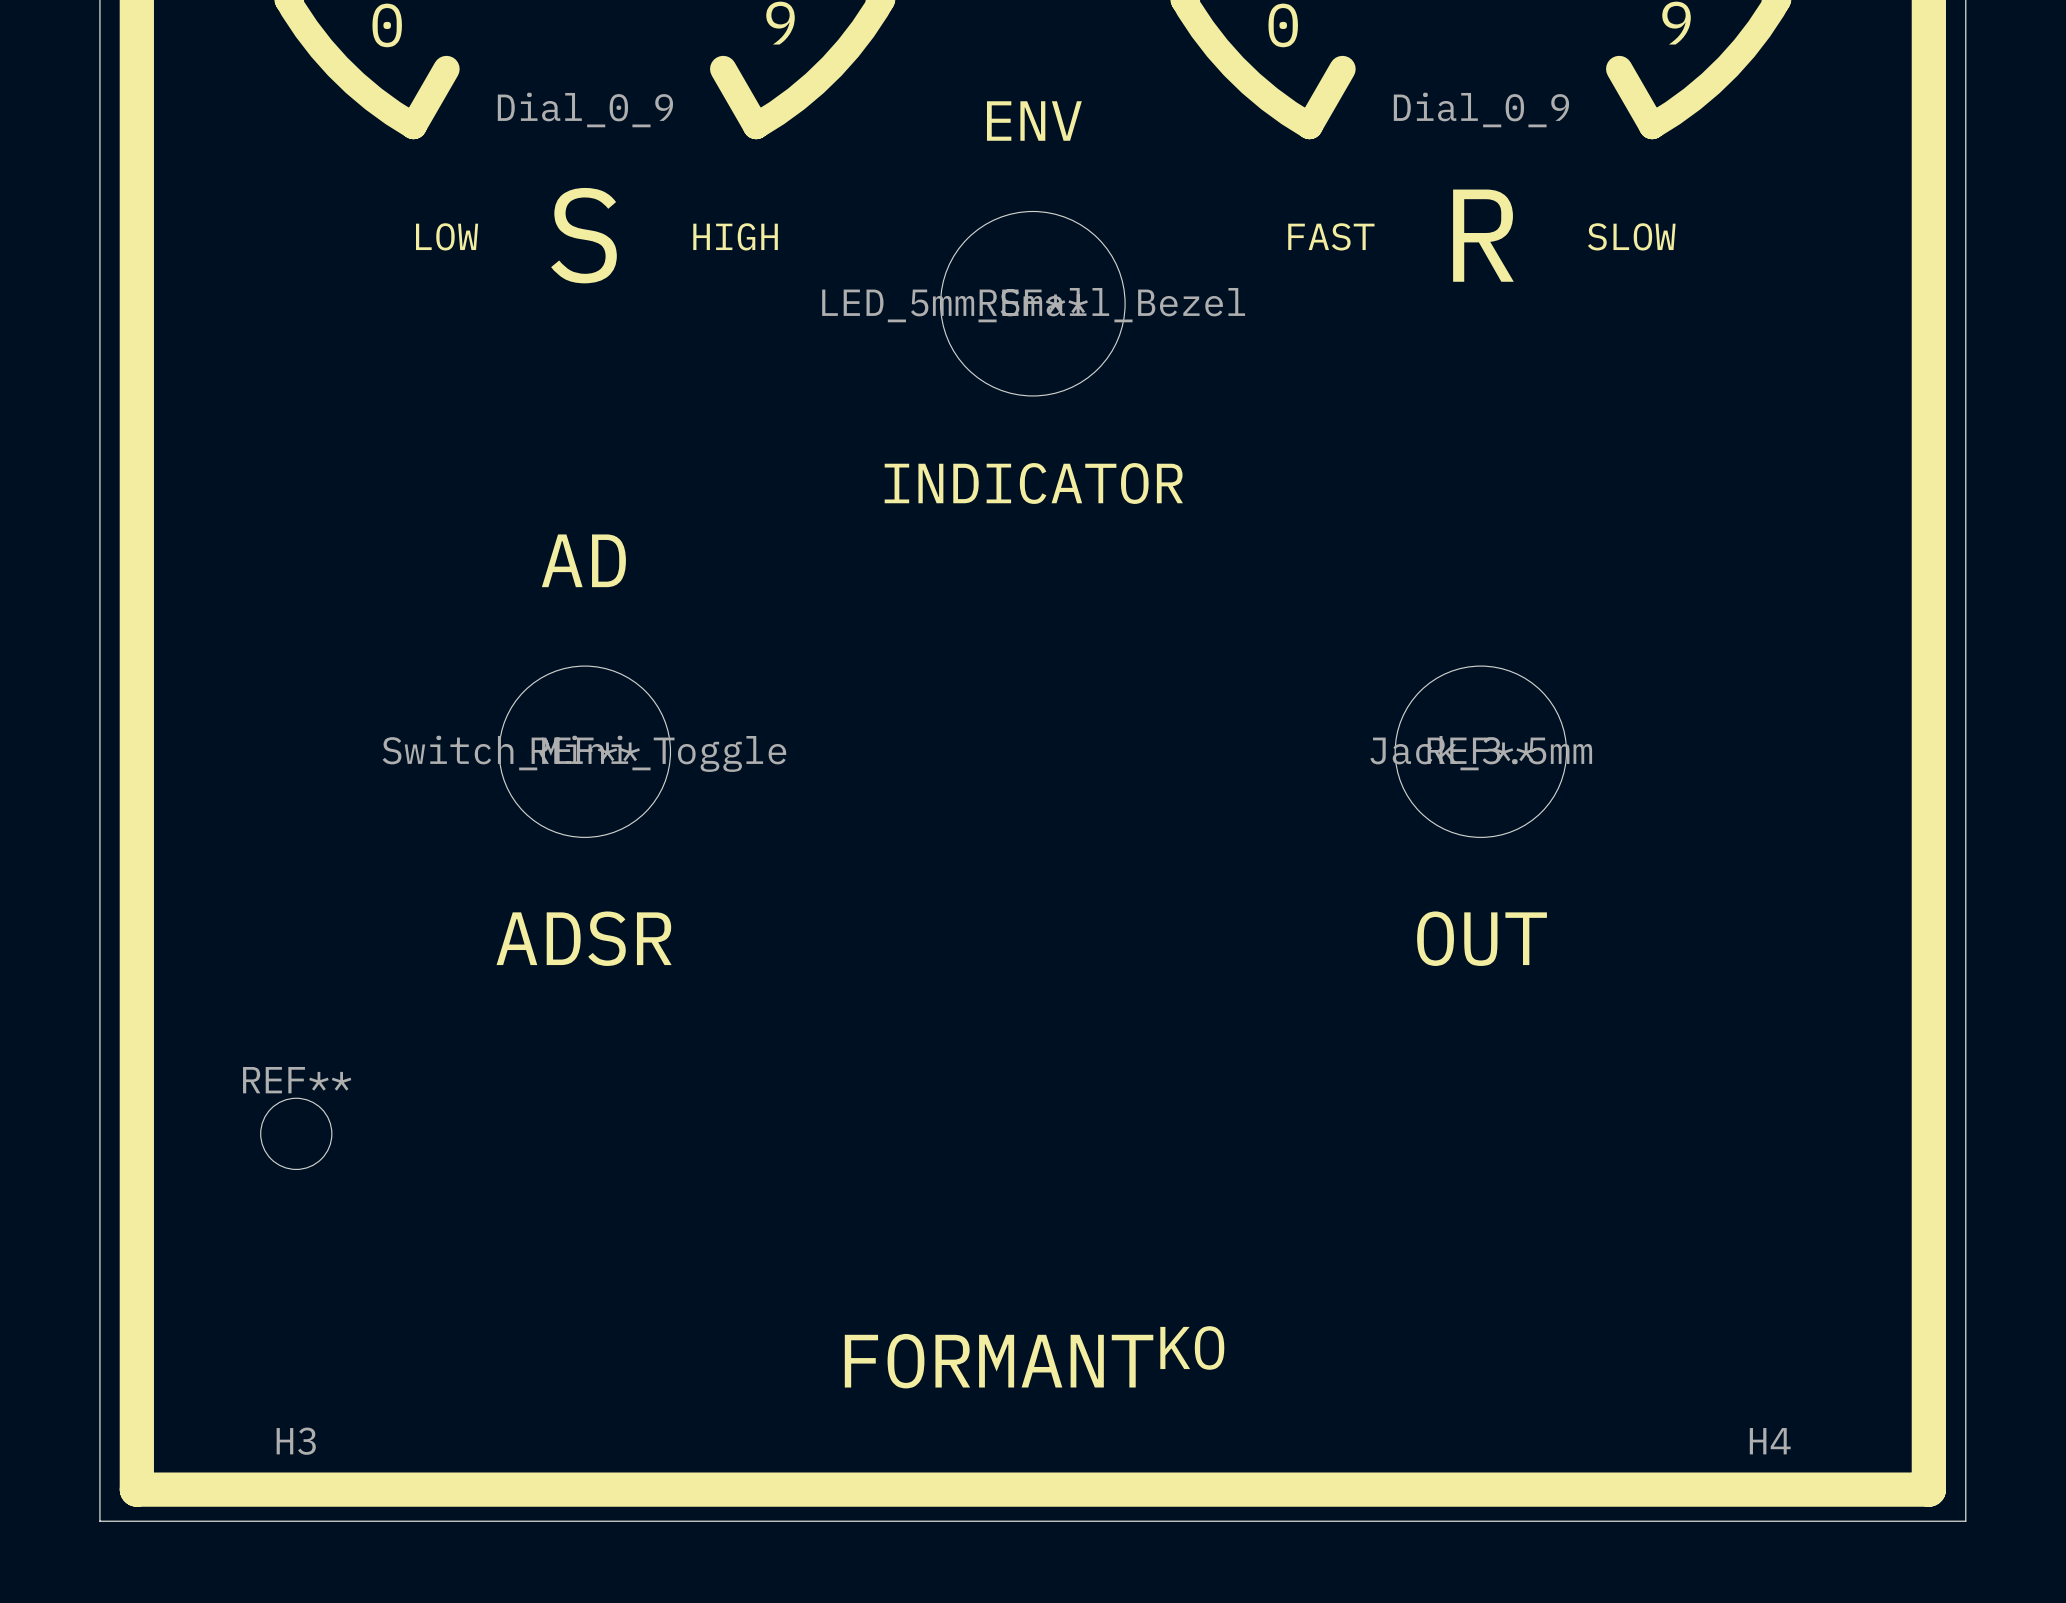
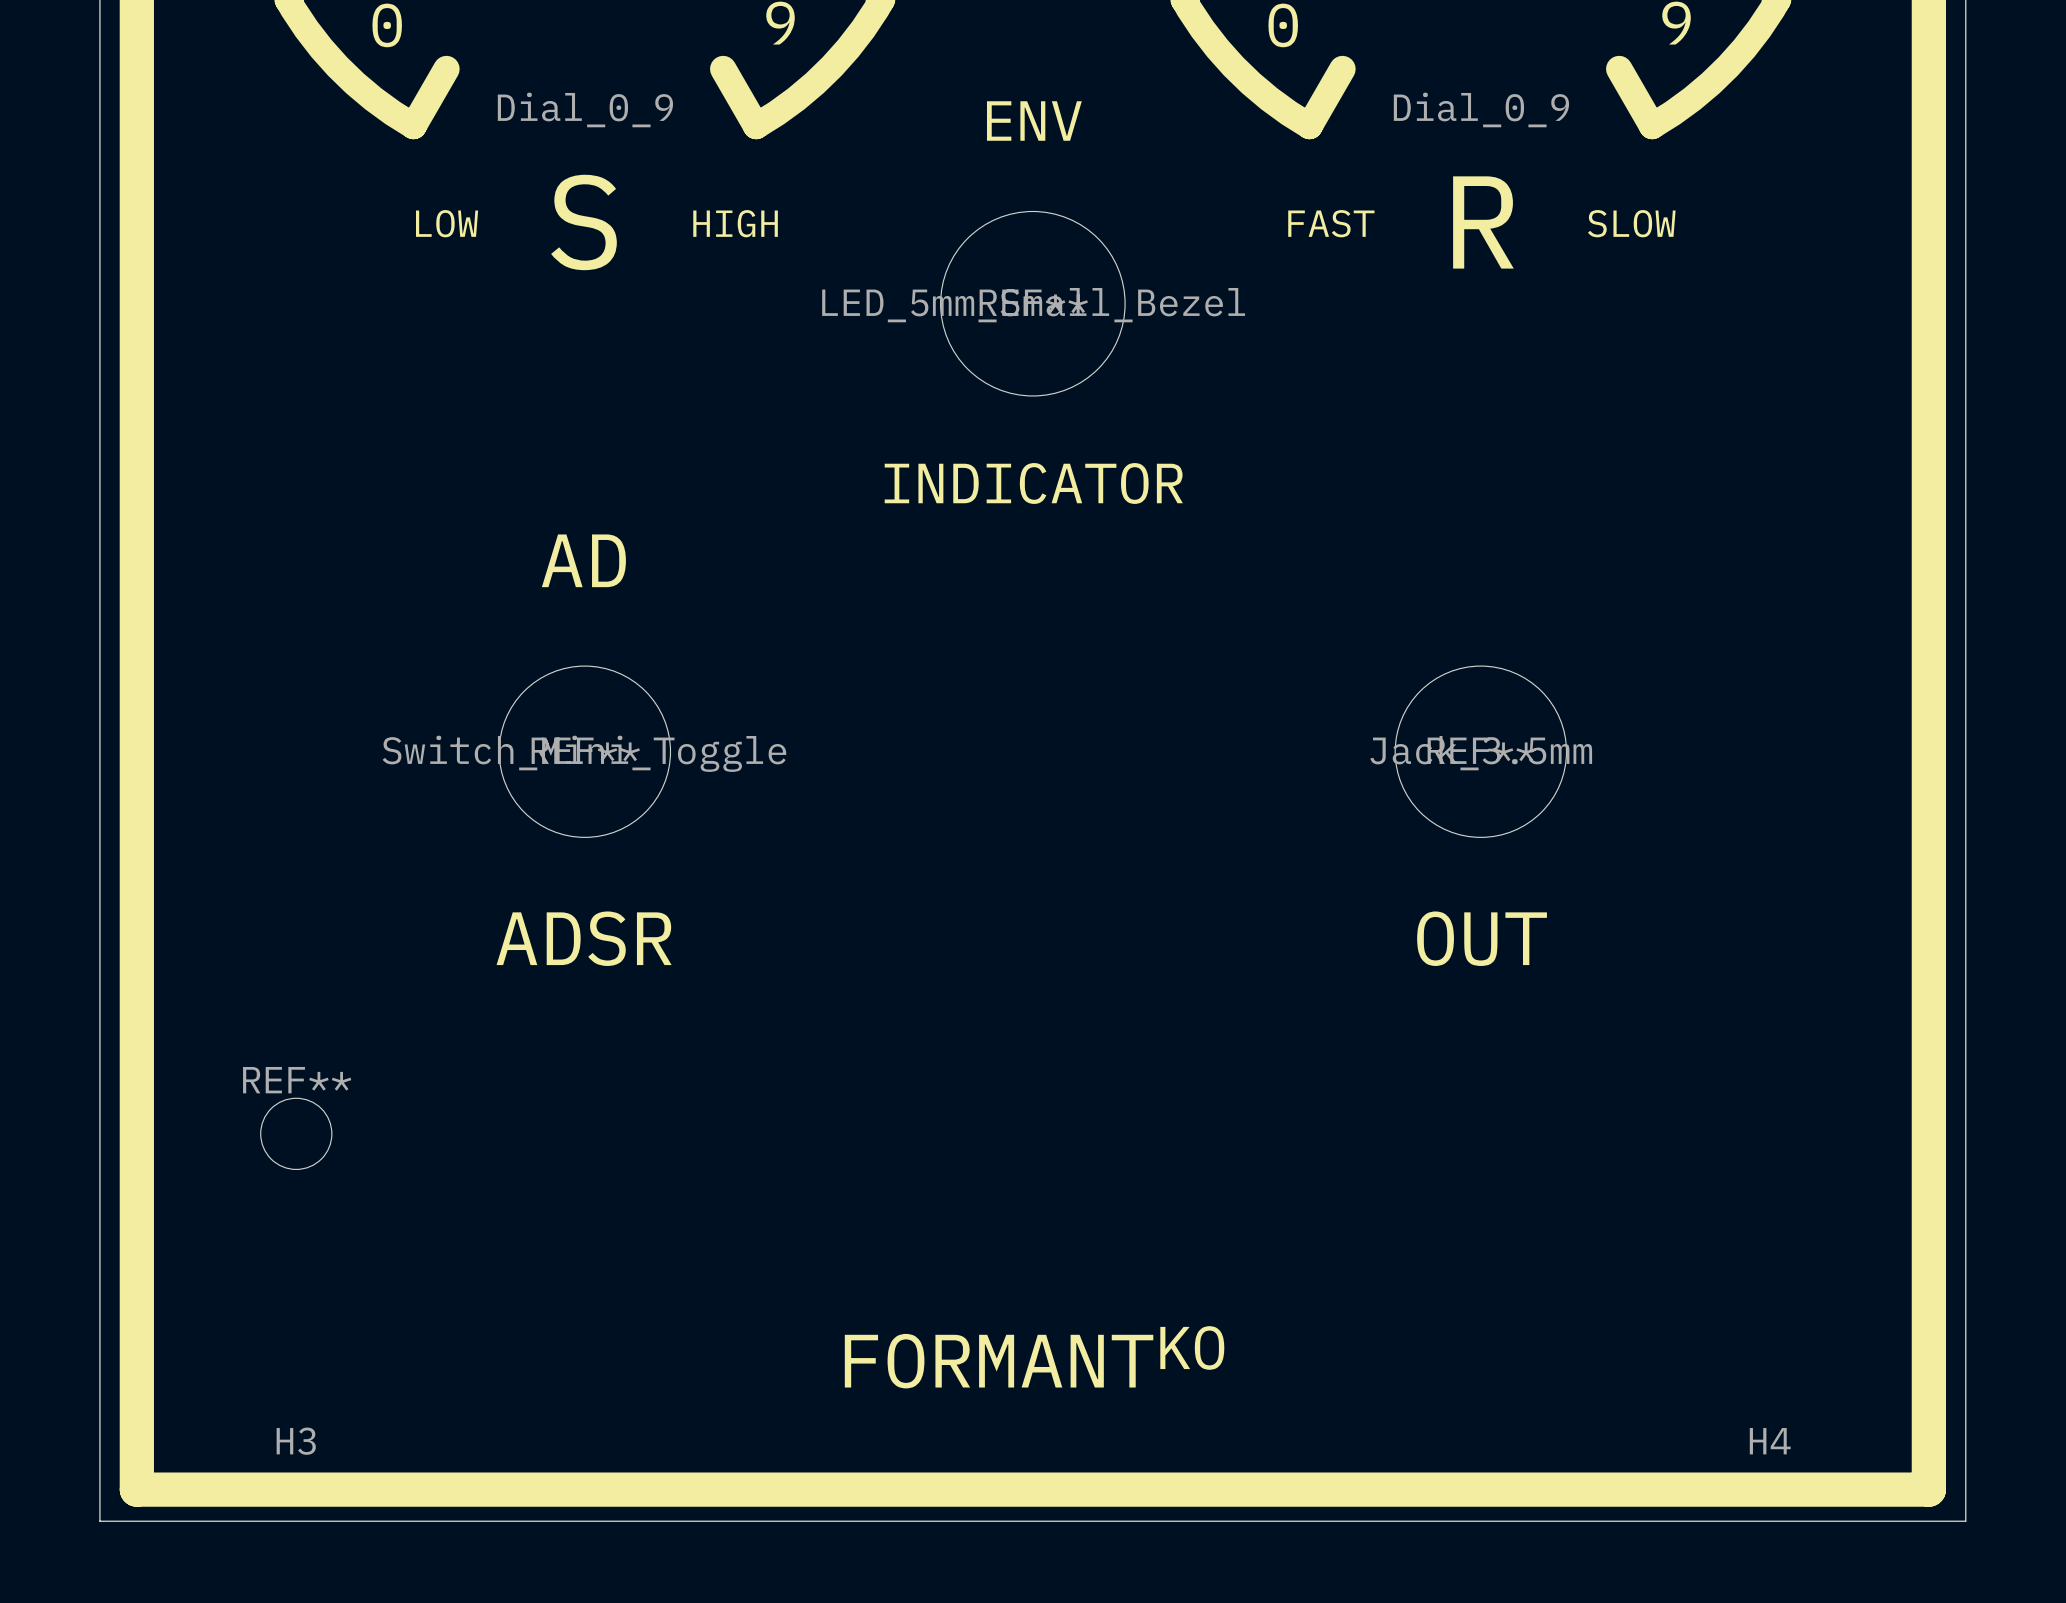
text position: S (583, 235) -> S (583, 222)
text position: R (1483, 235) -> R (1483, 222)
text position: LOW (447, 236) -> LOW (447, 223)
text position: HIGH (735, 236) -> HIGH (735, 223)
text position: FAST (1331, 236) -> FAST (1331, 223)
text position: SLOW (1631, 236) -> SLOW (1631, 223)

